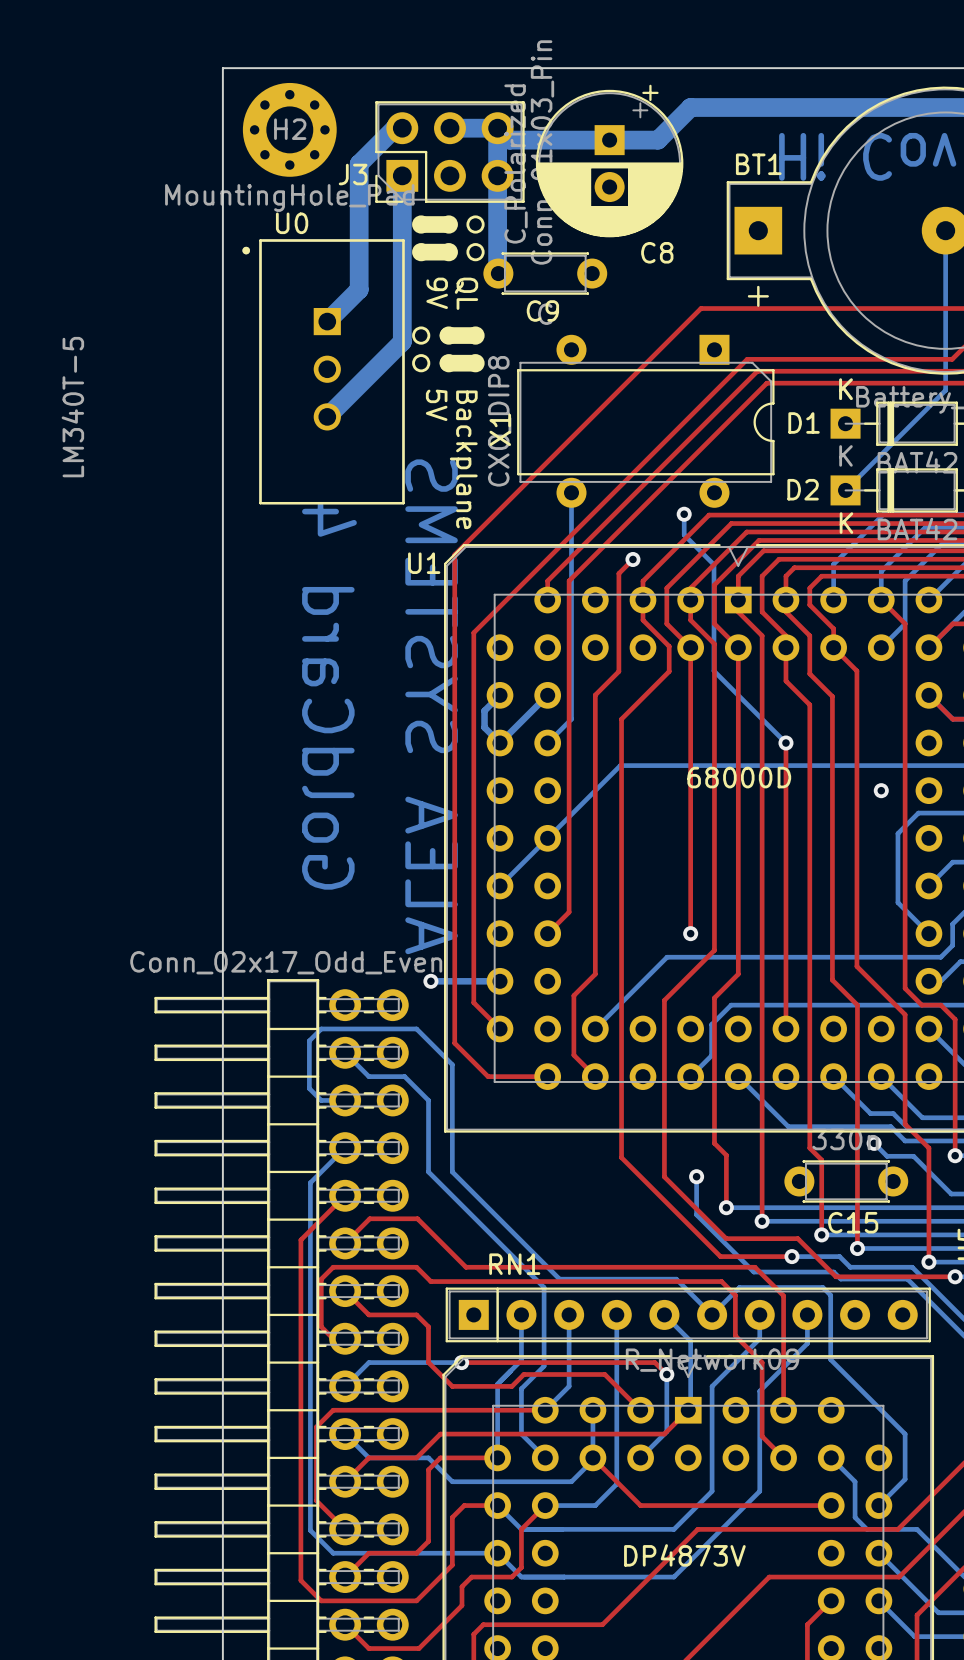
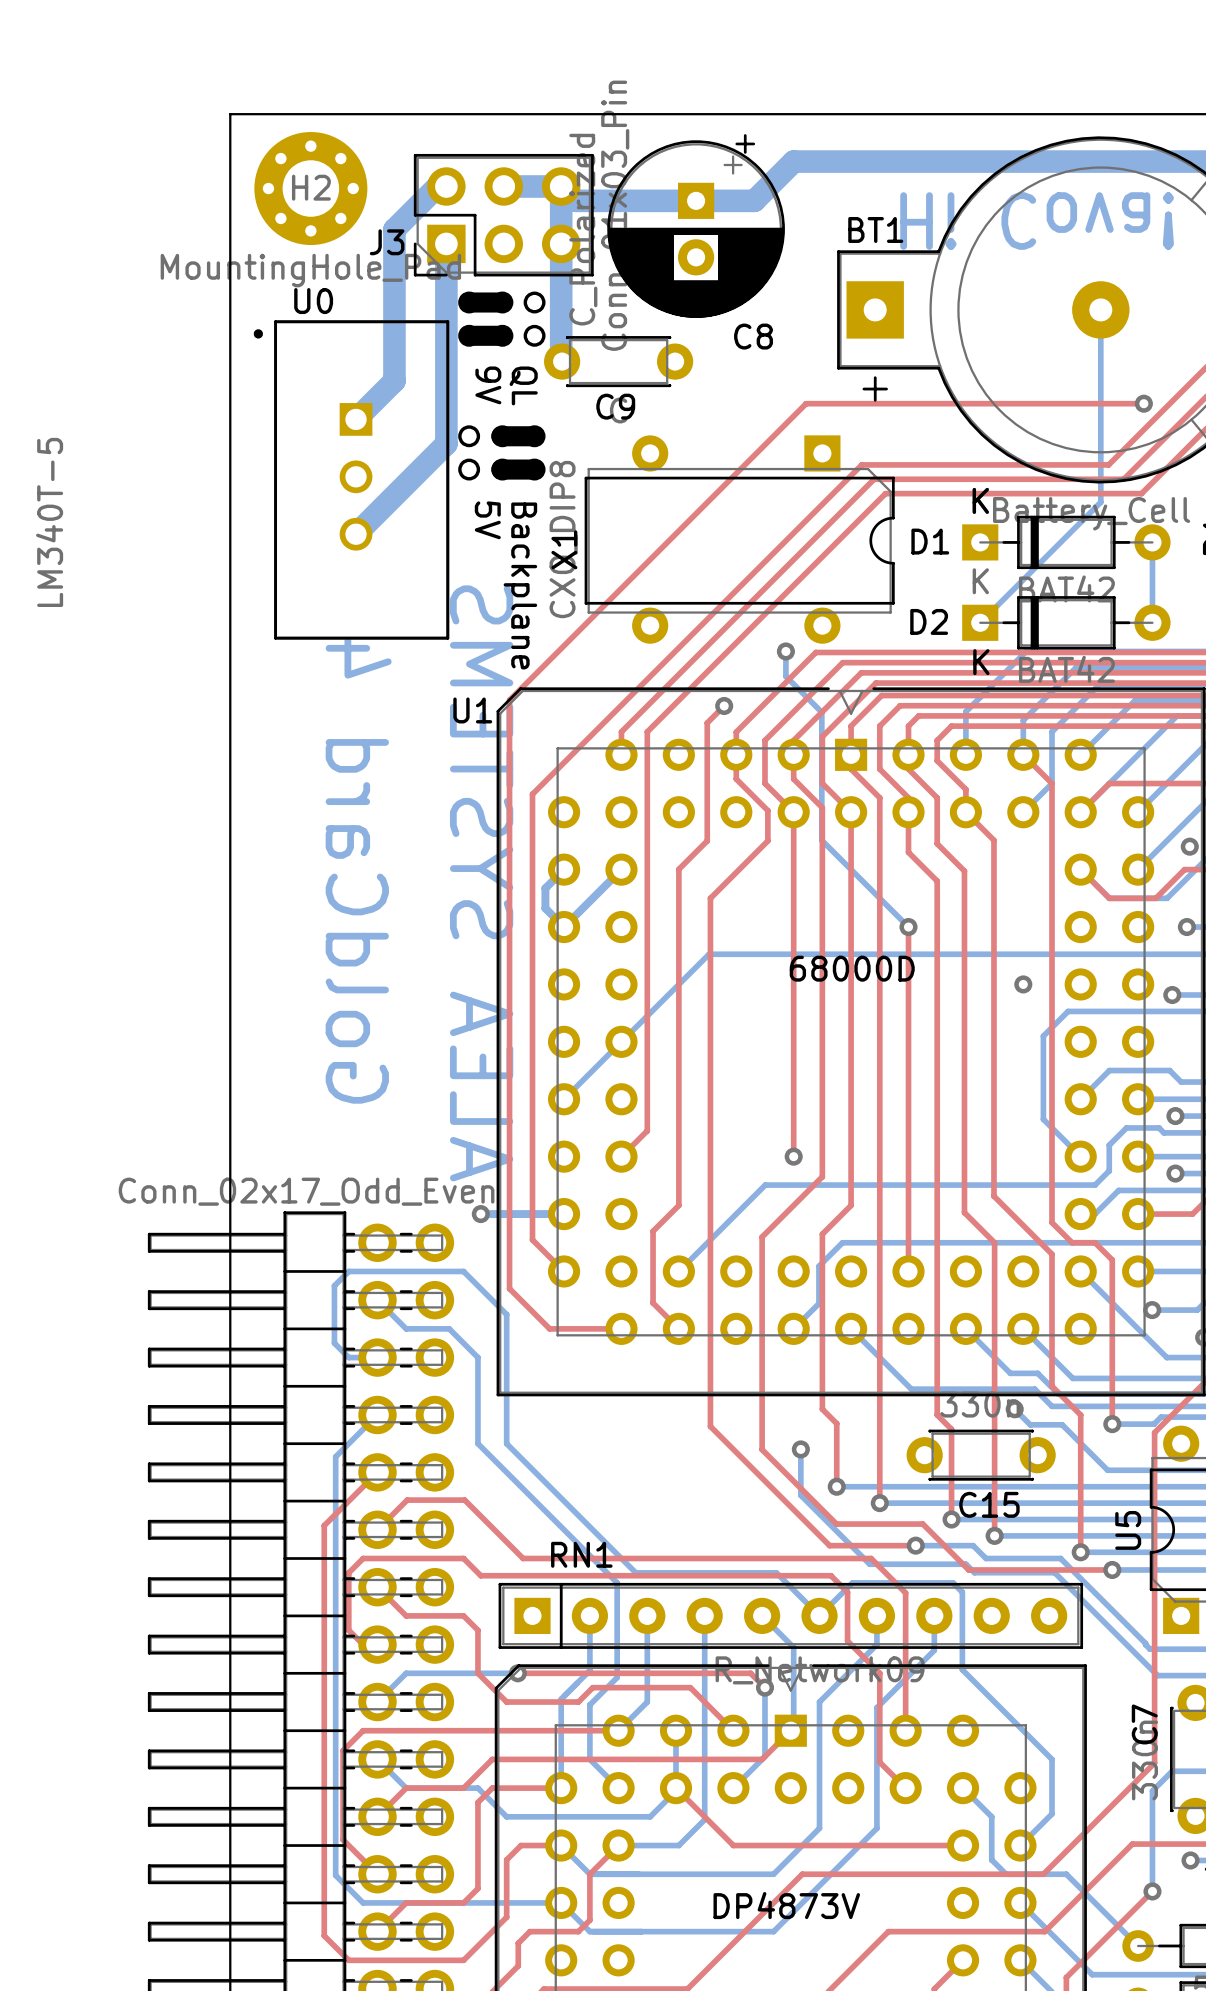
bottom track: (571, 492) (571, 719) (547, 743) -> none

